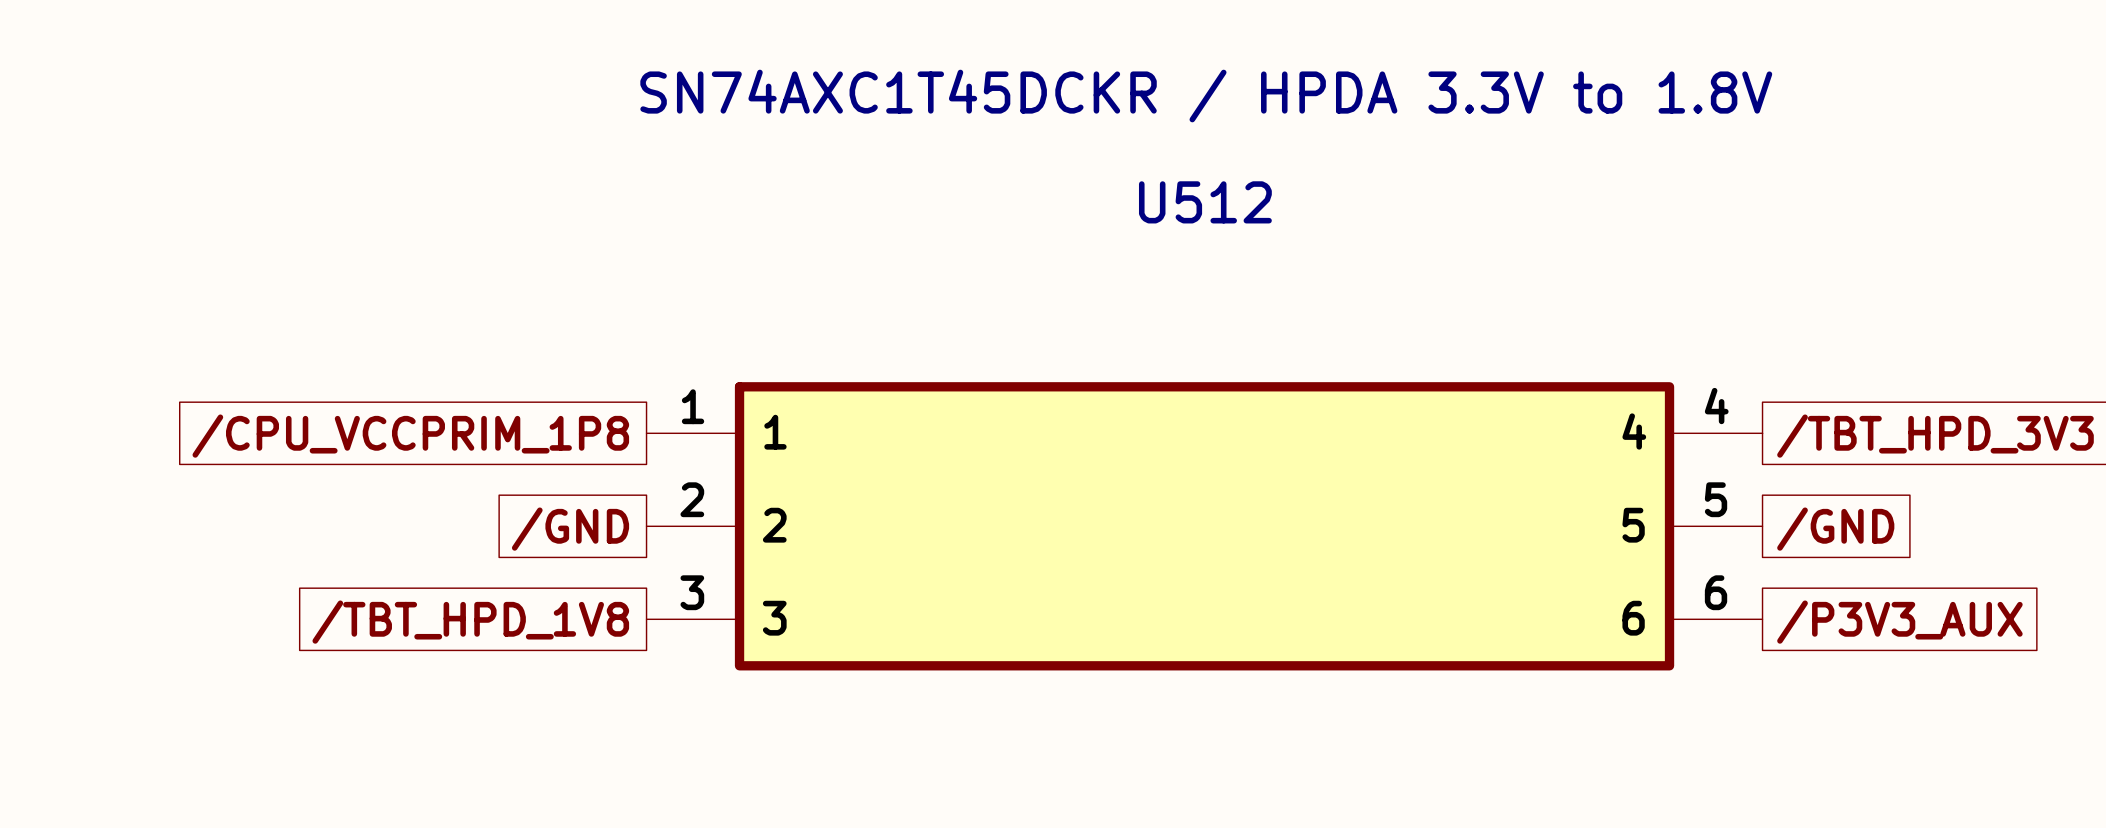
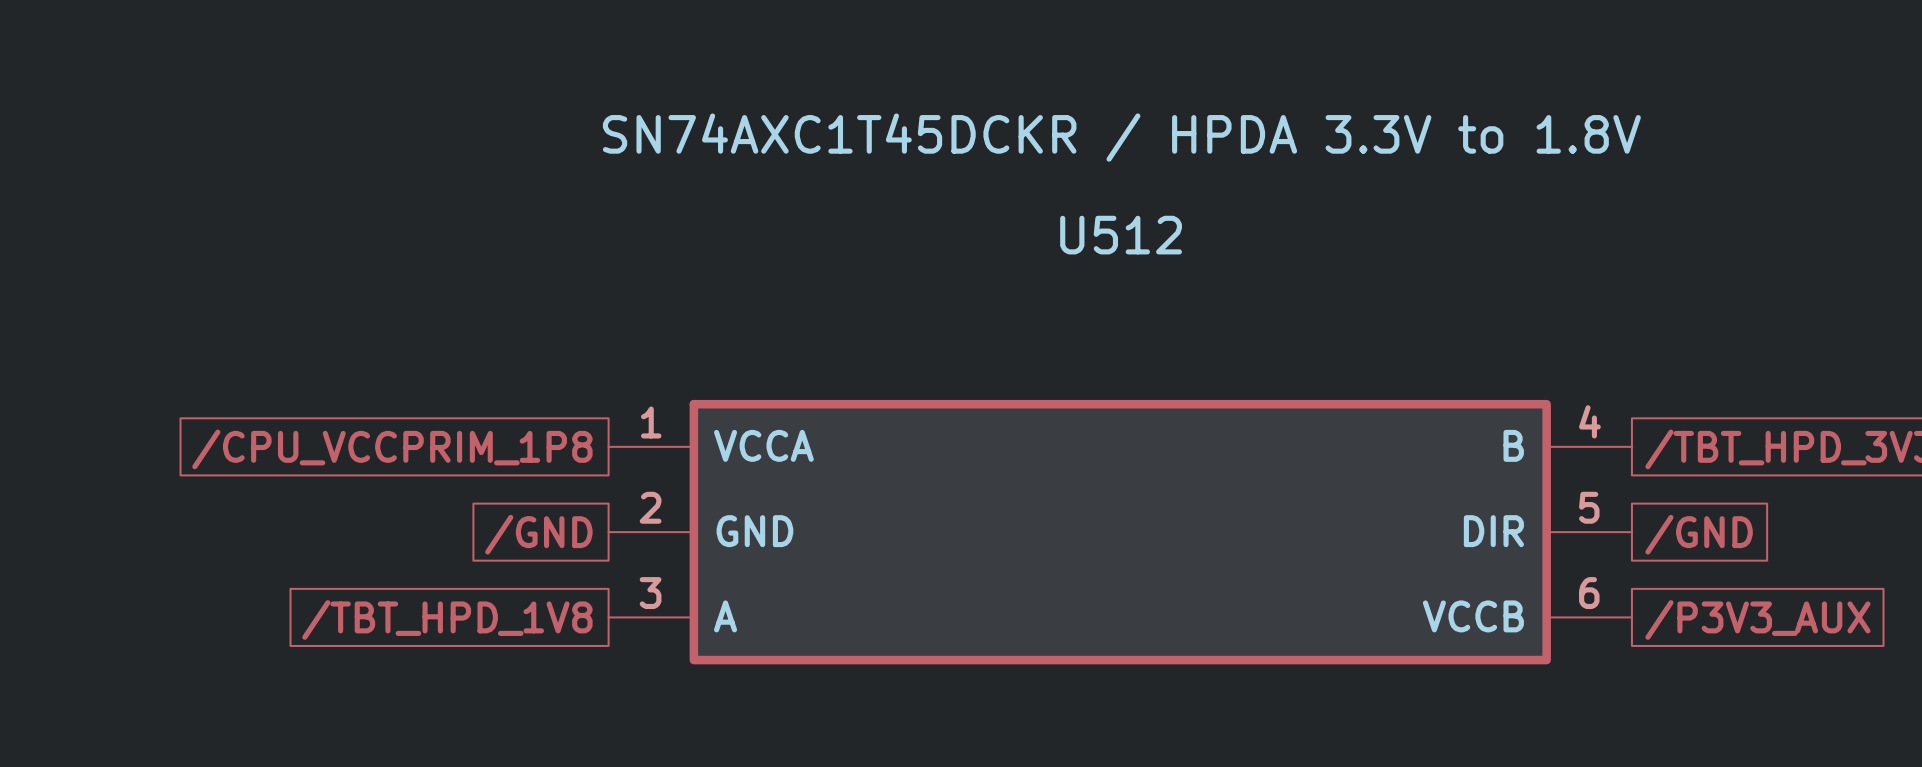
U512 pin name: 4 (1634, 431) -> B (1513, 445)
U512 pin name: 1 (775, 432) -> VCCA (763, 445)
U512 pin name: 2 (774, 525) -> GND (754, 531)
U512 pin name: 5 (1633, 525) -> DIR (1493, 531)
U512 pin name: 3 (774, 618) -> A (725, 616)
U512 pin name: 6 (1633, 618) -> VCCB (1473, 616)

